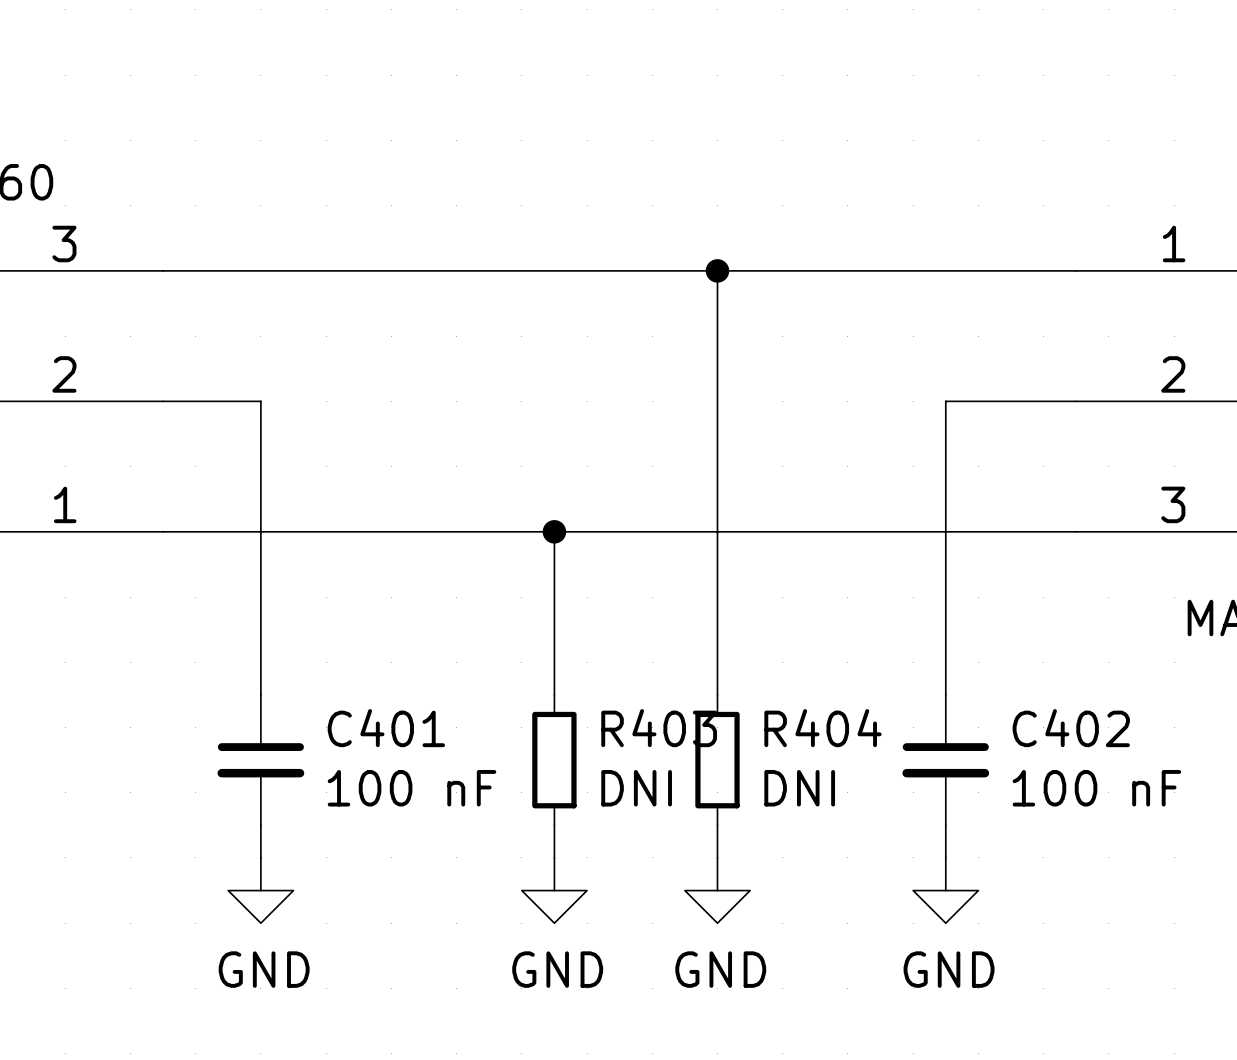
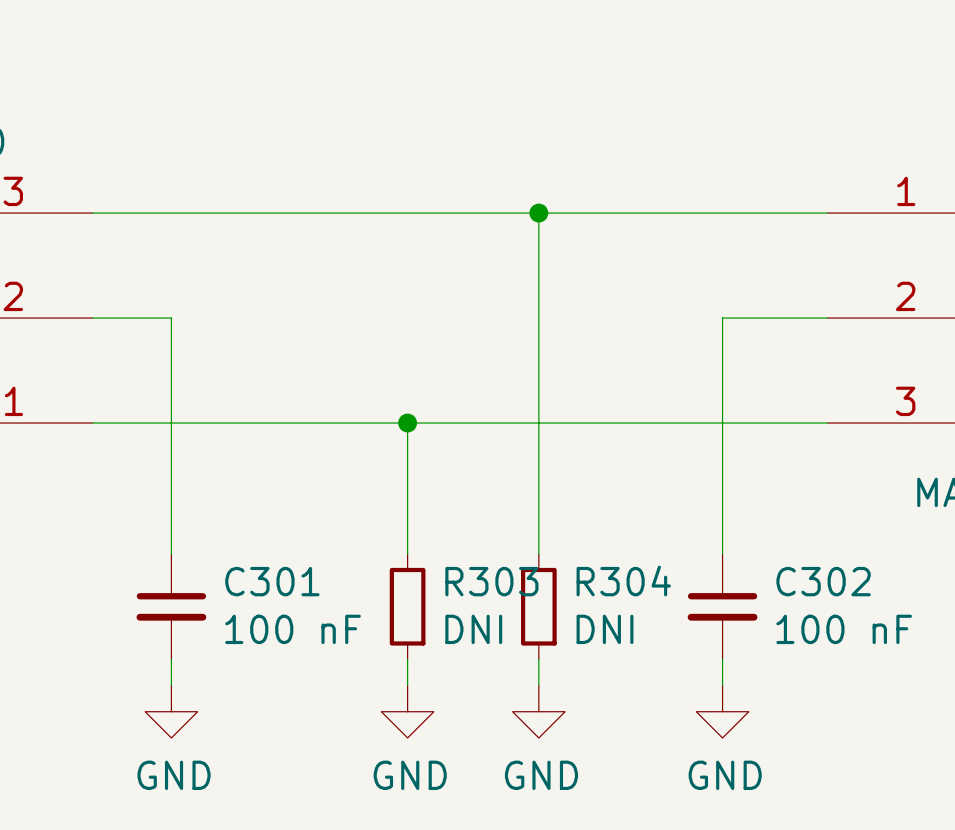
C401 name: C401 (386, 728) -> C301 (272, 581)
R403 name: R403 (659, 728) -> R303 (491, 581)
R404 name: R404 (823, 728) -> R304 (623, 580)
C402 name: C402 (1071, 728) -> C302 (823, 581)

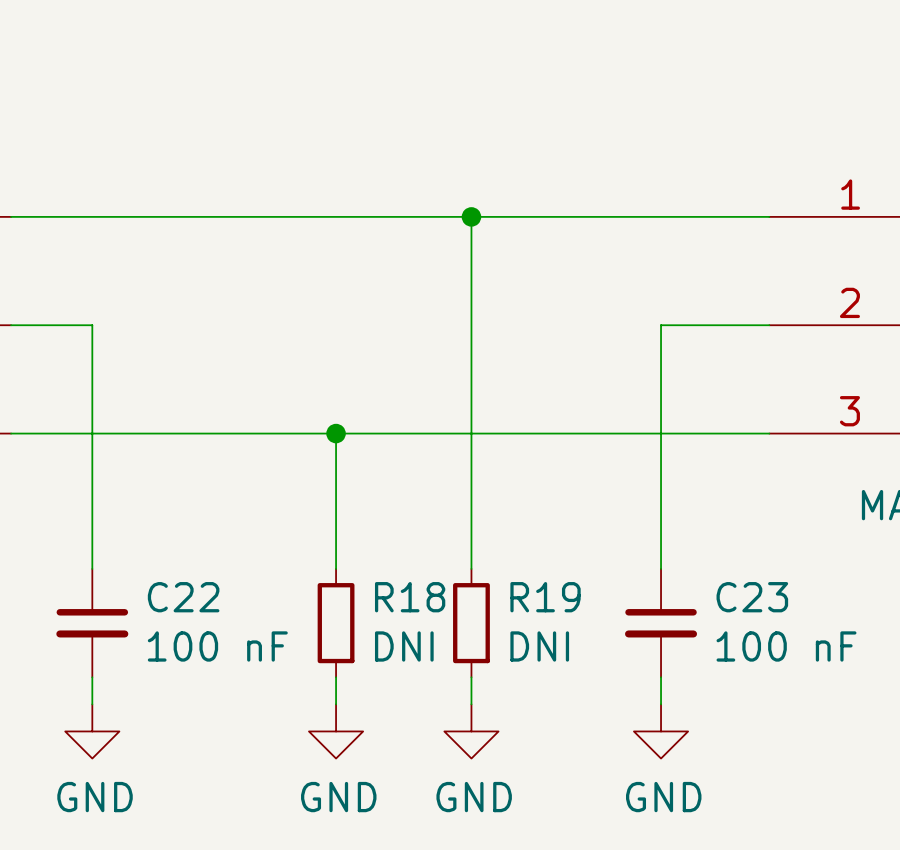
R304 name: R304 (623, 580) -> R19 (545, 597)
C301 name: C301 (272, 581) -> C22 (183, 597)
R303 name: R303 (491, 581) -> R18 (410, 597)
C302 name: C302 (823, 581) -> C23 (752, 597)

